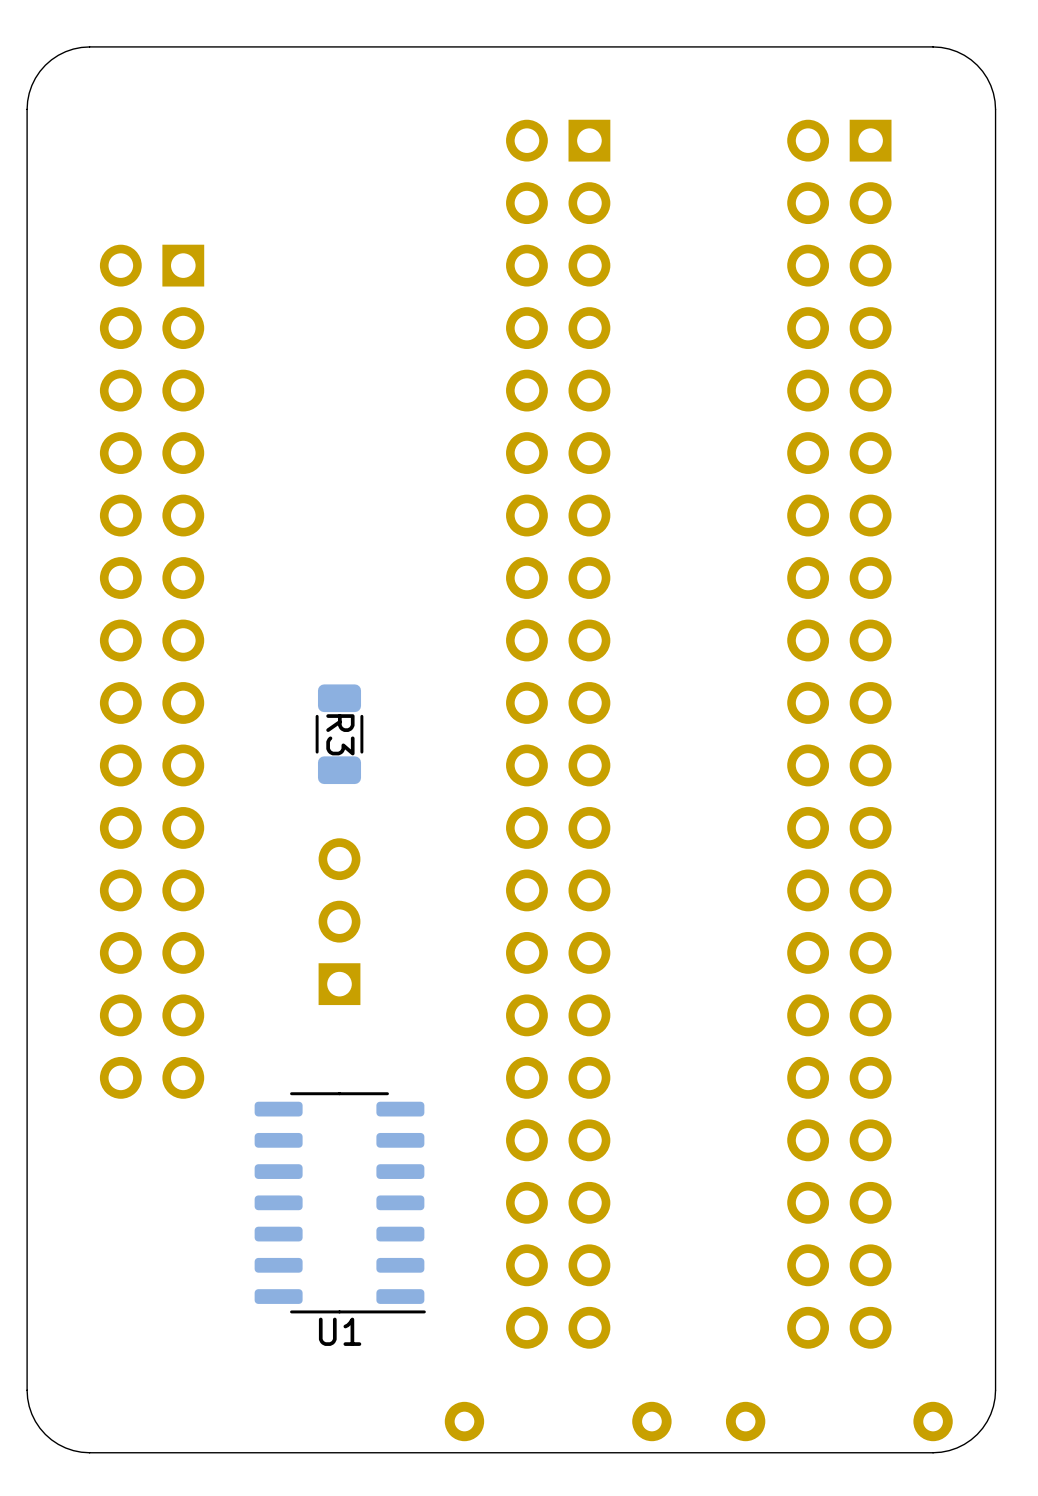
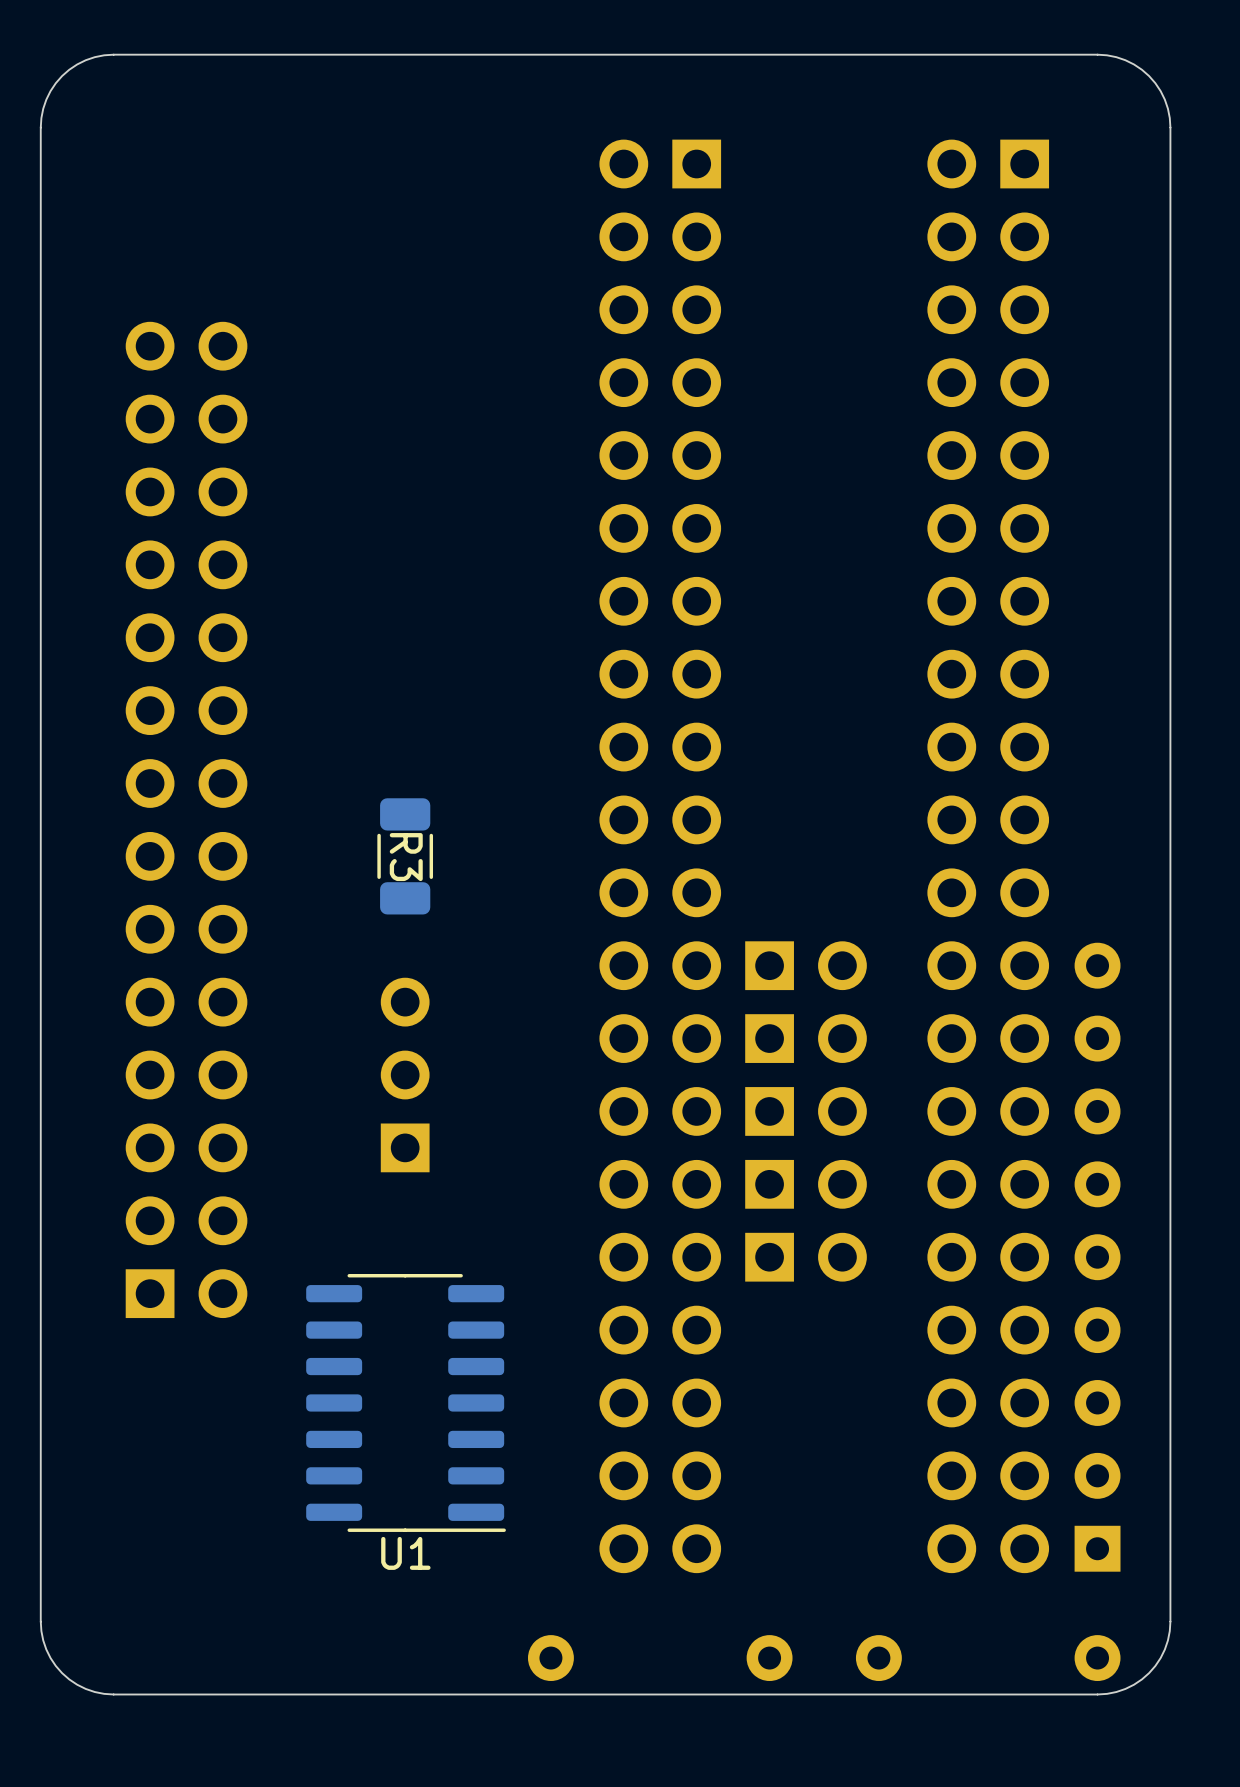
part rotation: 0° (152, 671) -> 180° (186, 819)
part: none -> (806, 965)
part: none -> (806, 1038)
part: none -> (806, 1111)
part: none -> (806, 1184)
part: none -> (806, 1257)
part: none -> (1097, 1257)

